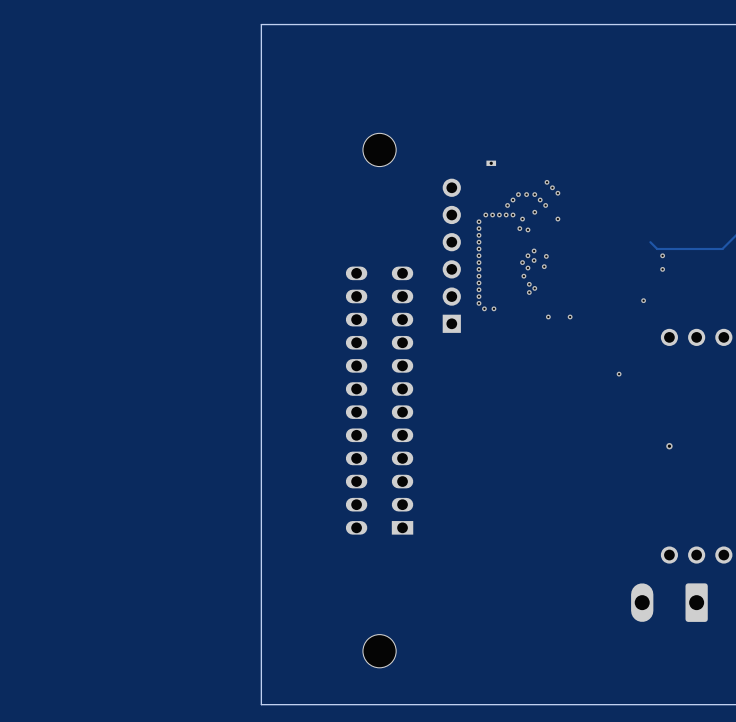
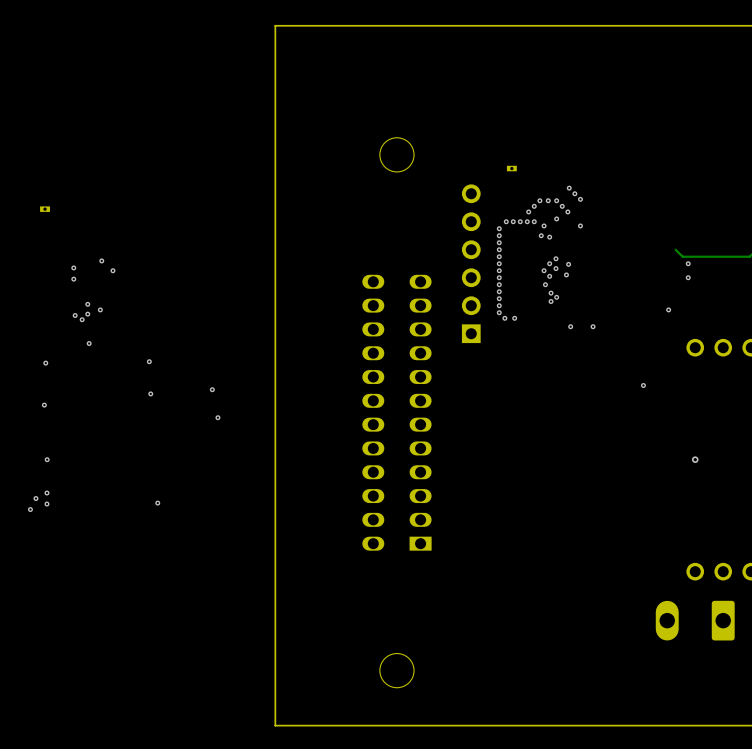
part: none -> (45, 209)
via: none -> (101, 260)
via: none -> (73, 267)
via: none -> (112, 270)
via: none -> (73, 279)
via: none -> (87, 304)
via: none -> (100, 309)
via: none -> (87, 314)
via: none -> (75, 315)
via: none -> (82, 319)
via: none -> (89, 343)
via: none -> (149, 361)
via: none -> (45, 363)
via: none -> (212, 389)
via: none -> (150, 393)
via: none -> (44, 405)
via: none -> (217, 417)
via: none -> (47, 459)
via: none -> (46, 493)
via: none -> (35, 498)
via: none -> (157, 503)
via: none -> (46, 504)
via: none -> (30, 509)

